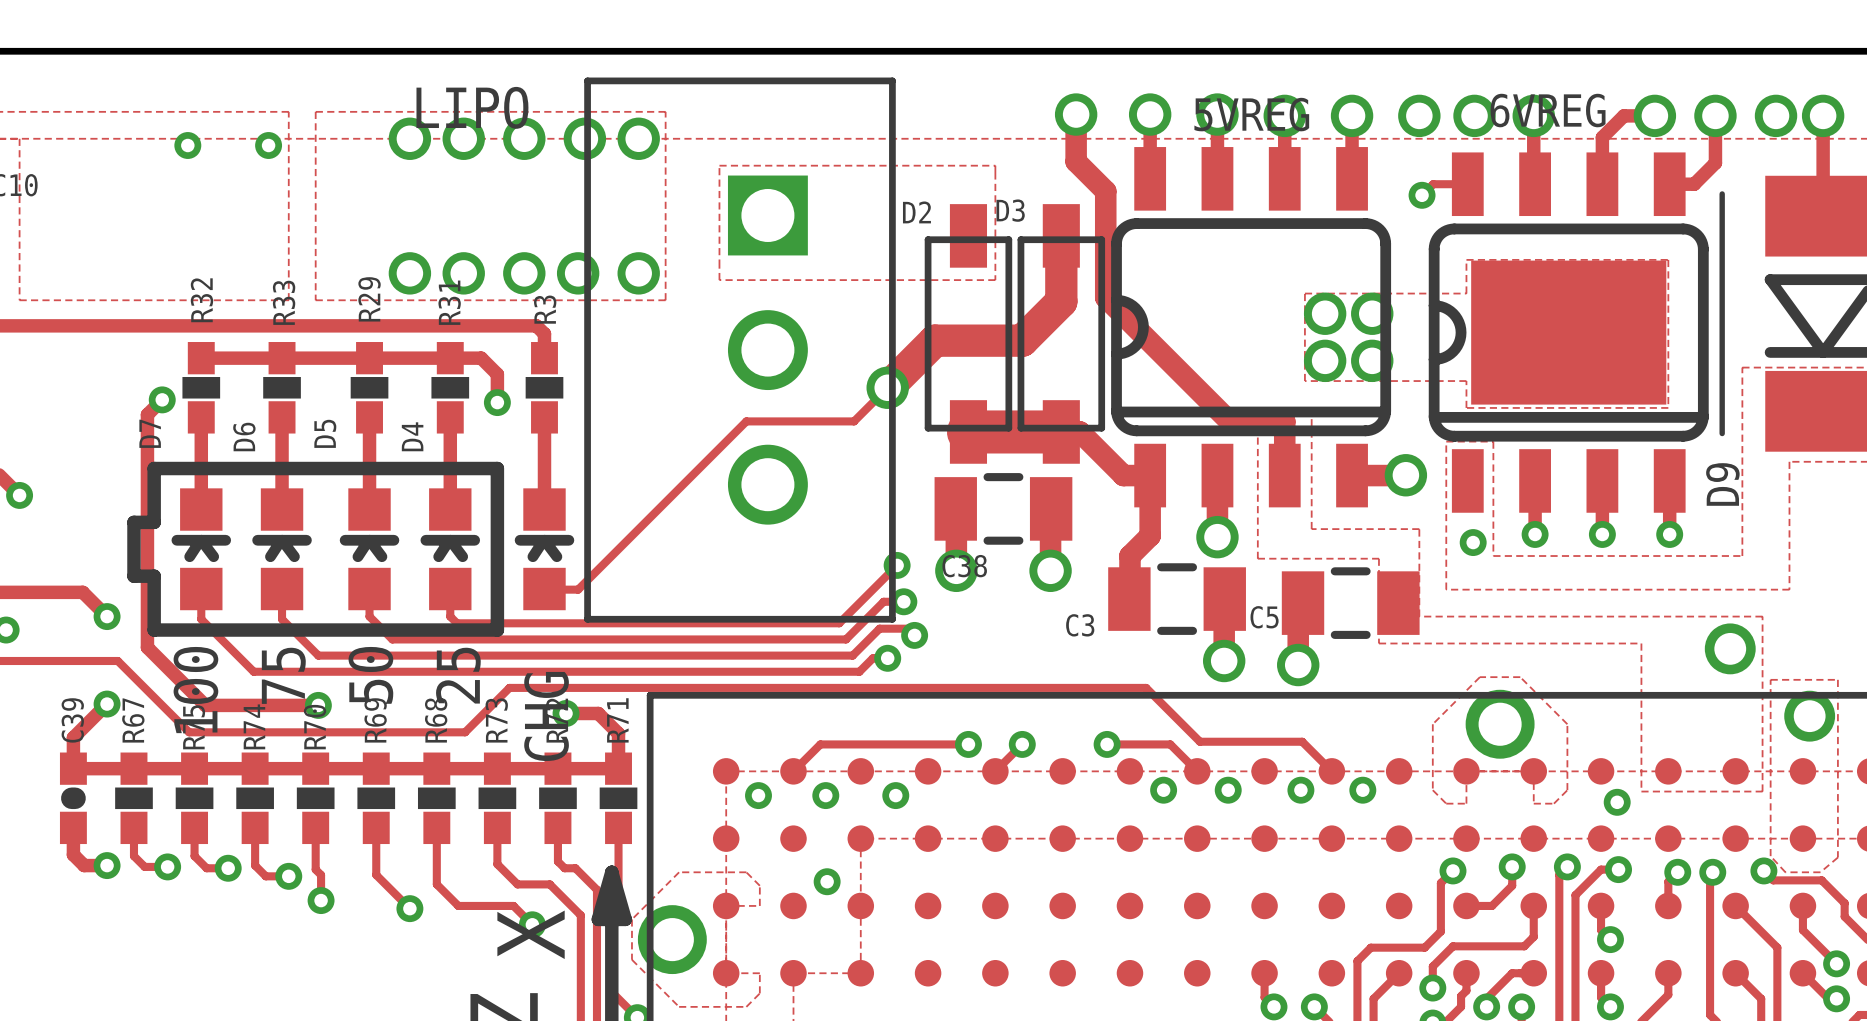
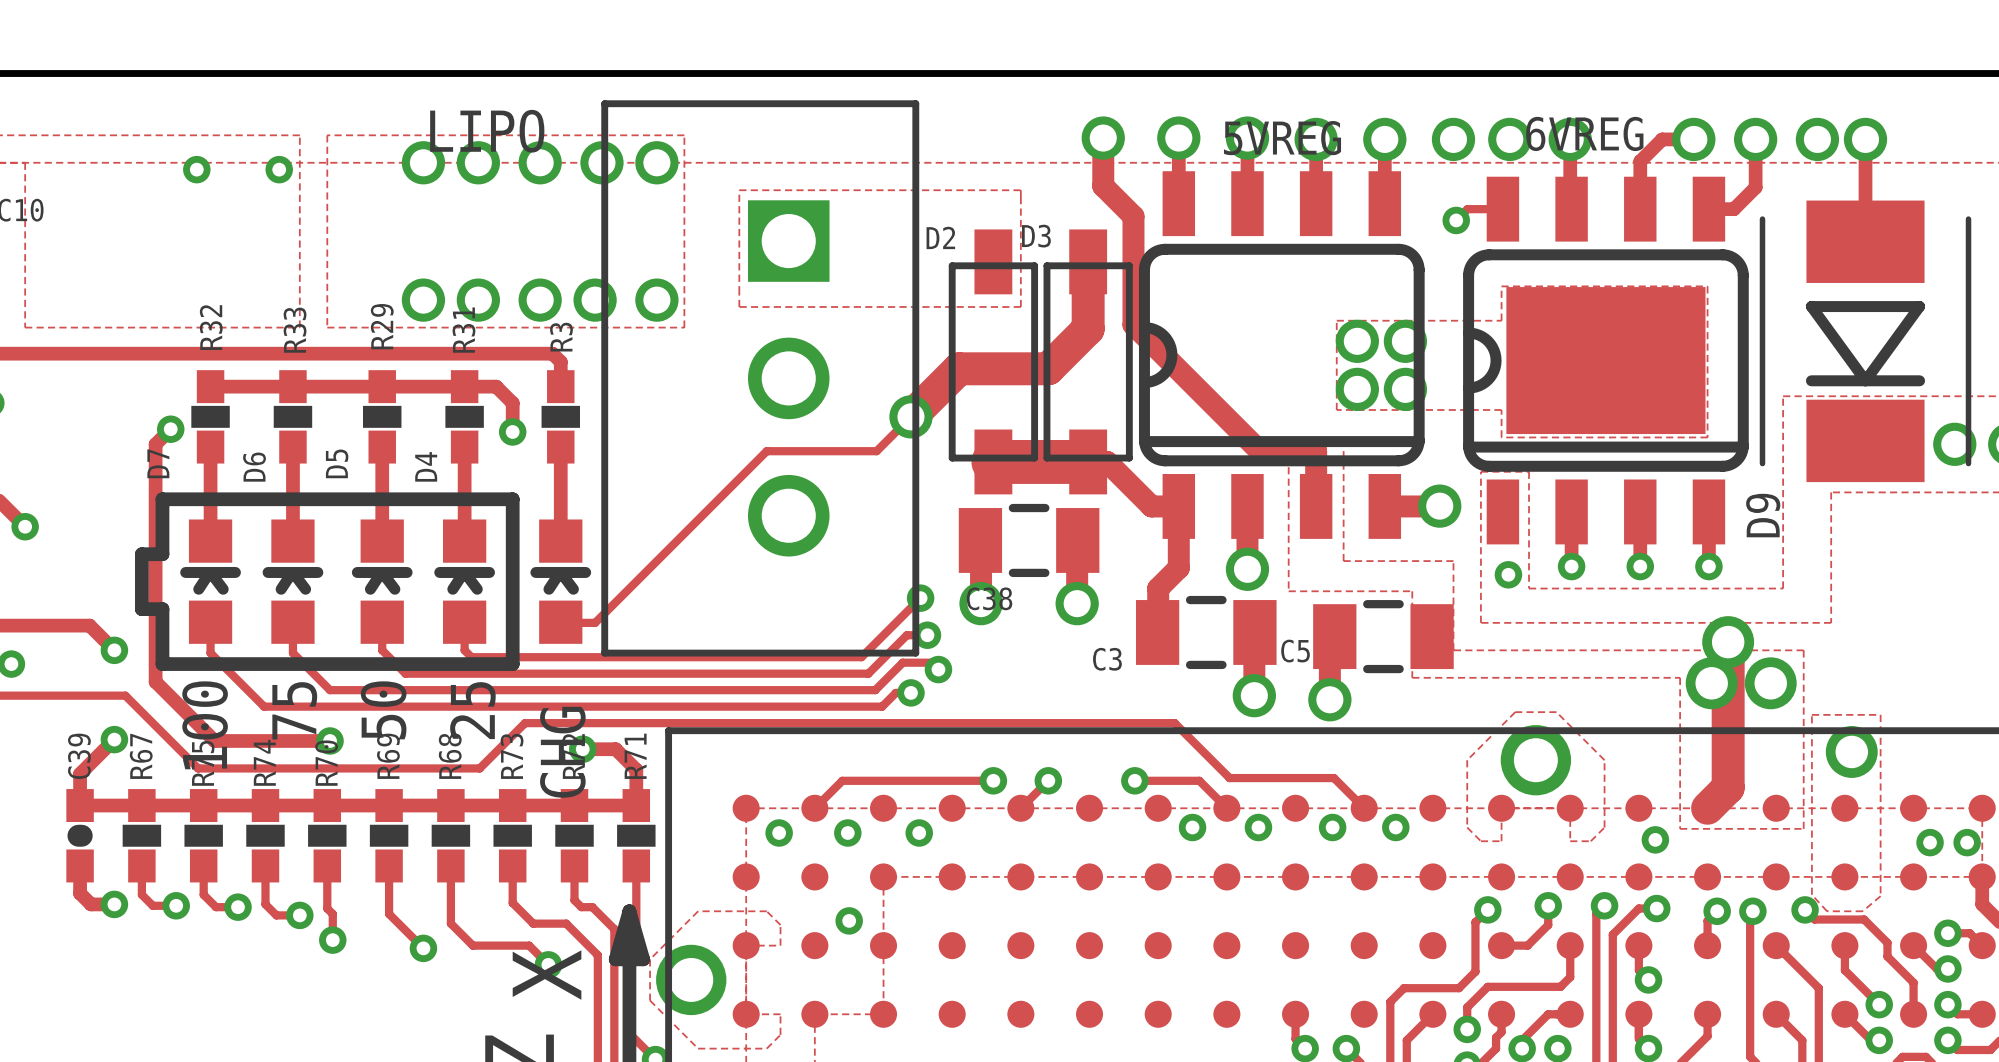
track: none -> (1728, 642) (1728, 787) (1707, 808)
via: none -> (1728, 642)
via: none -> (1711, 683)

